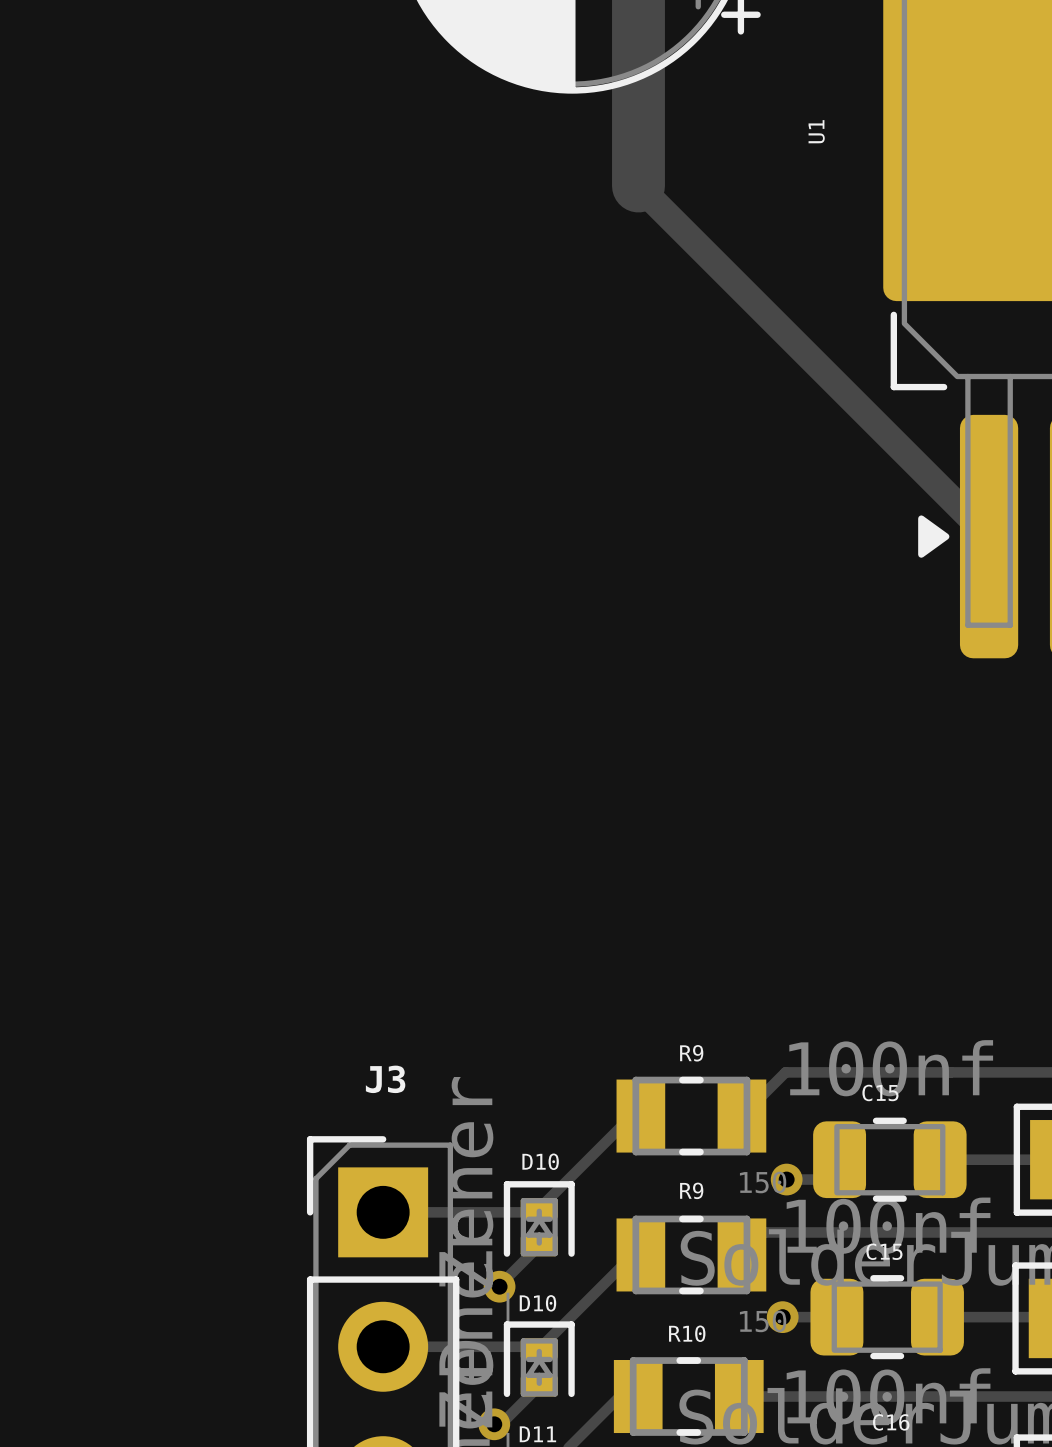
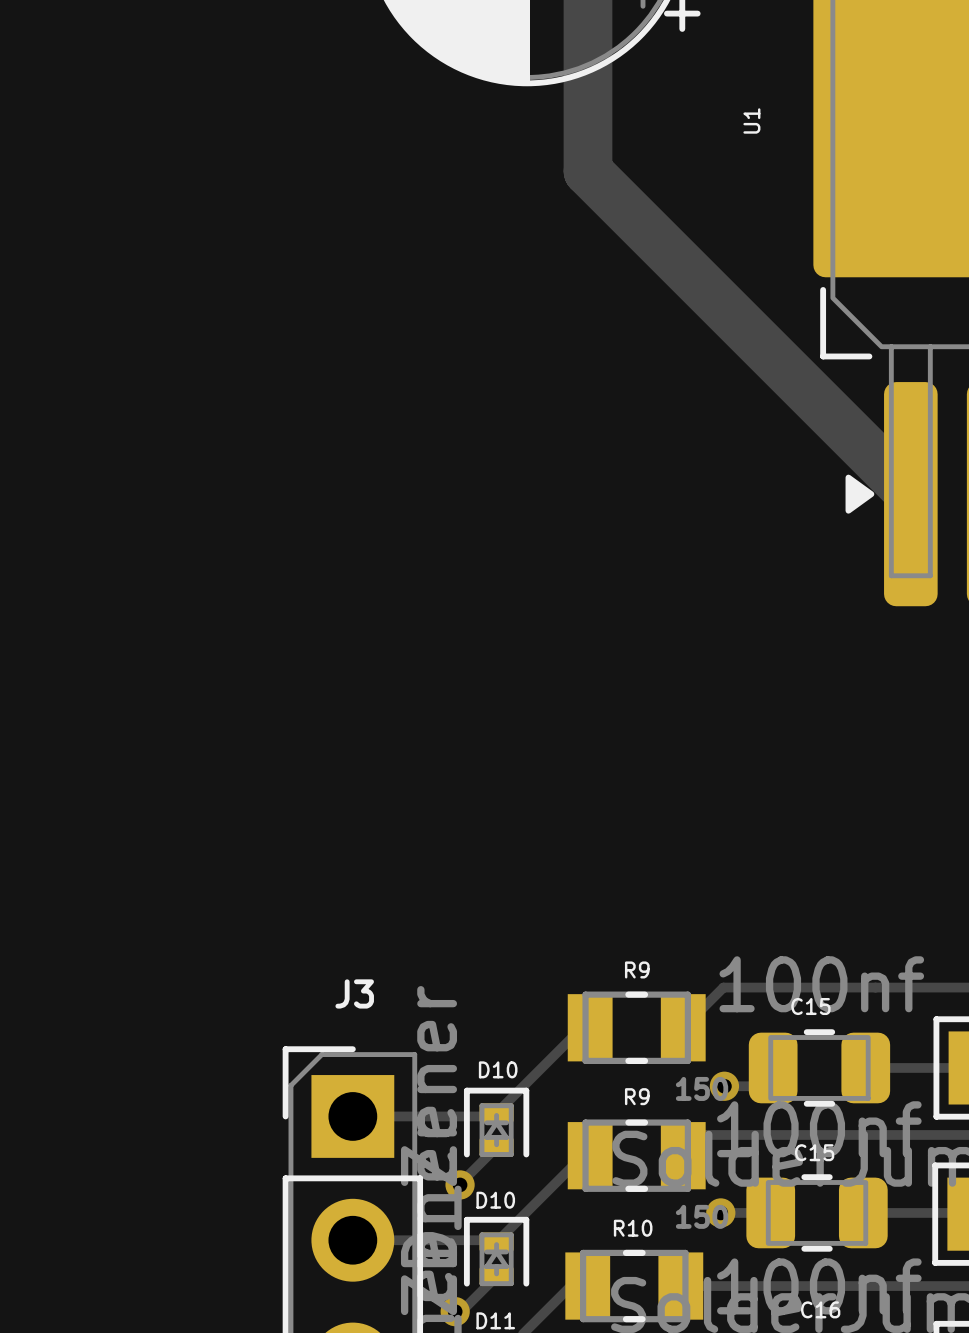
track width: thin (638, 186) (989, 536) -> thick (587, 171) (910, 494)

